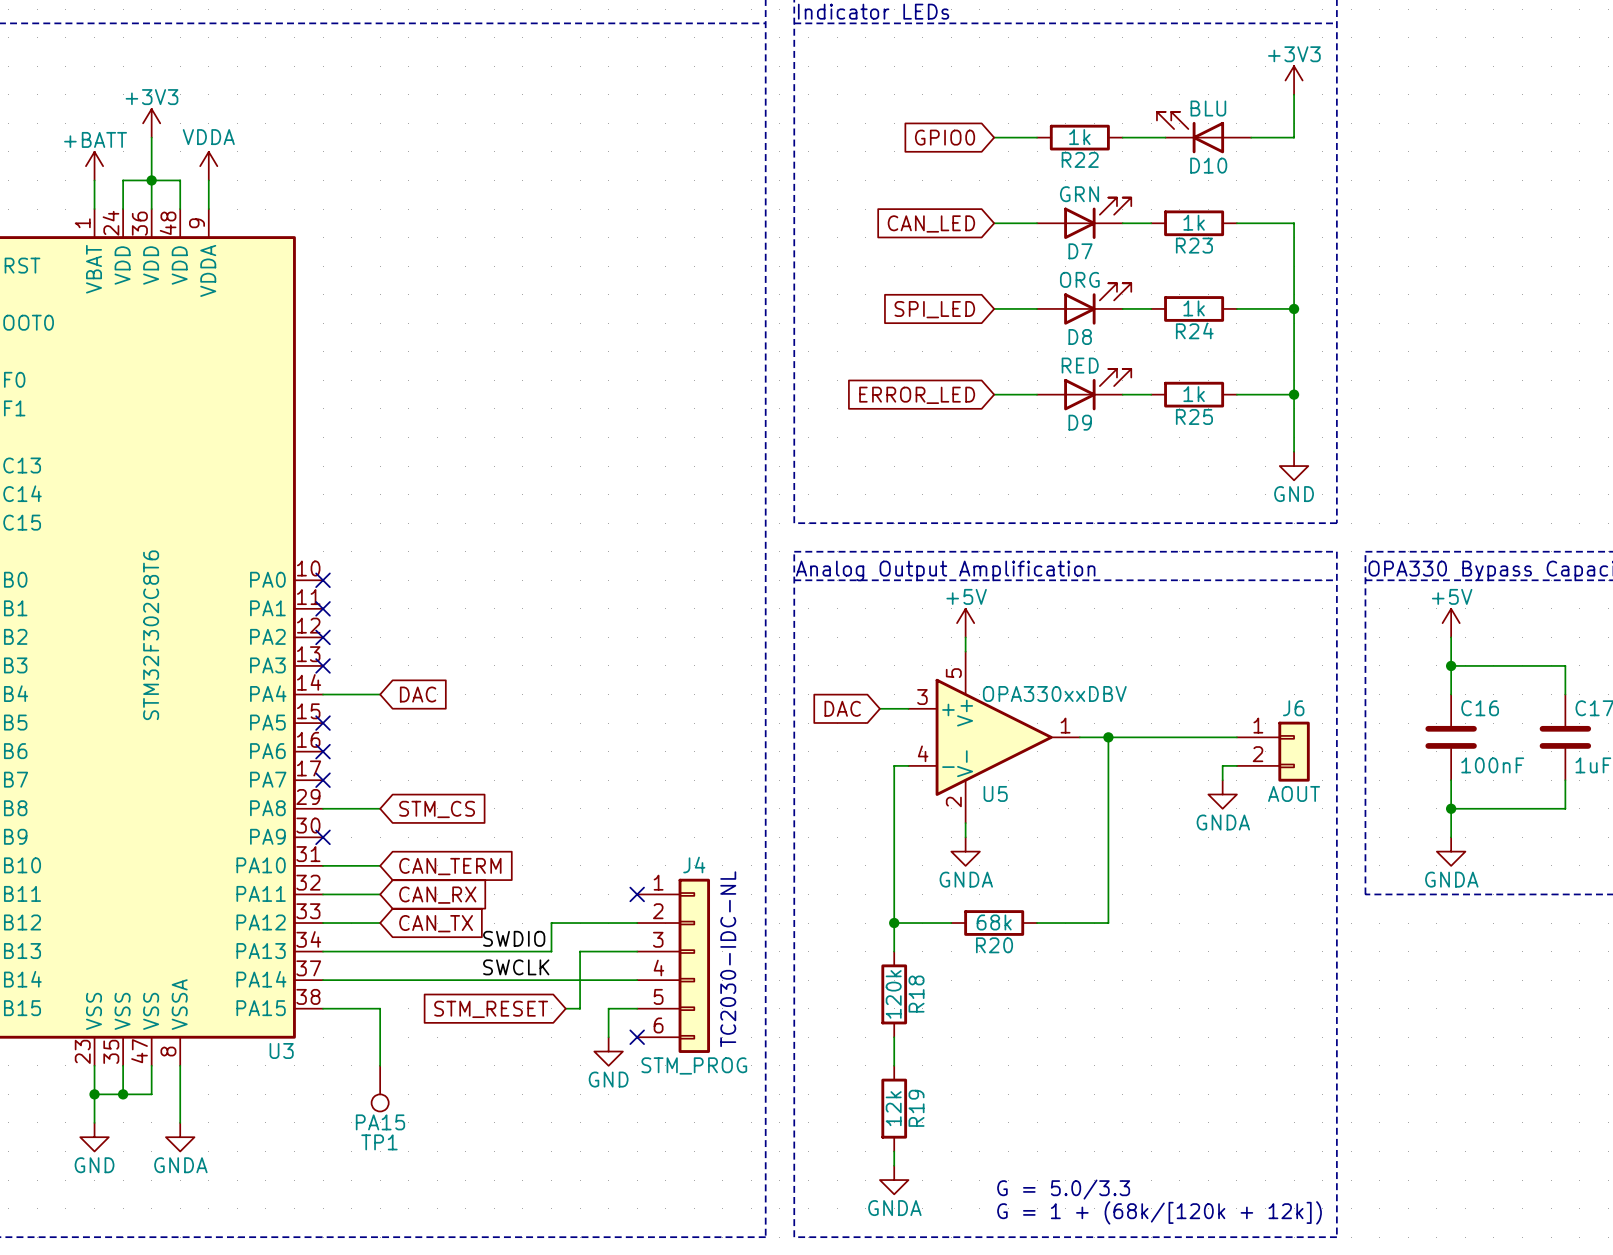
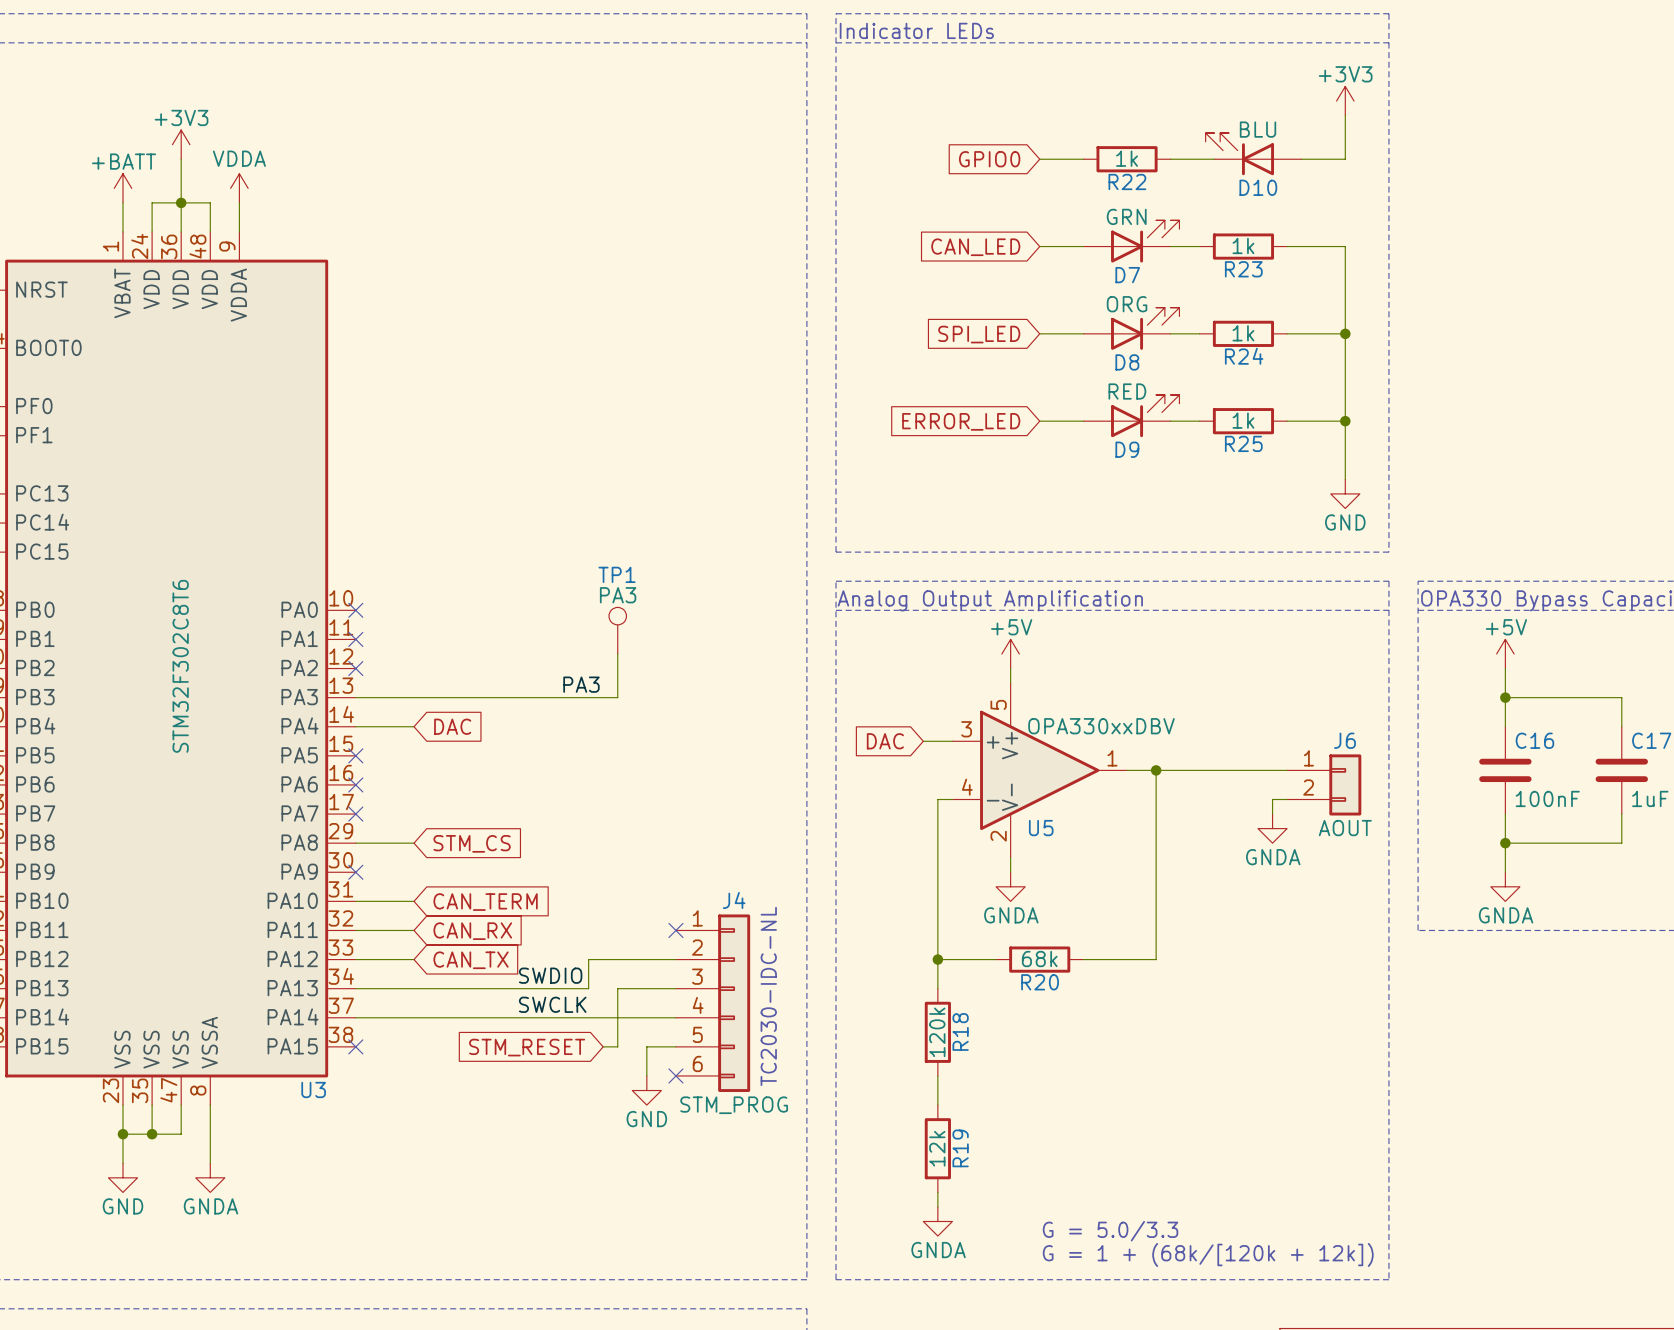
wire: none -> (617, 653) (617, 697) (355, 697)
label: none -> PA3 (581, 684)
no-connect mark: (323, 665) -> none
wire: (323, 1008) (380, 1008) (380, 1065) -> none
no-connect mark: none -> (355, 1046)
TP1 position: (380, 1088) -> (617, 630)
TP1 rotation: 0° (380, 1102) -> 180° (617, 616)
TP1 value: PA15 (380, 1122) -> PA3 (618, 595)

